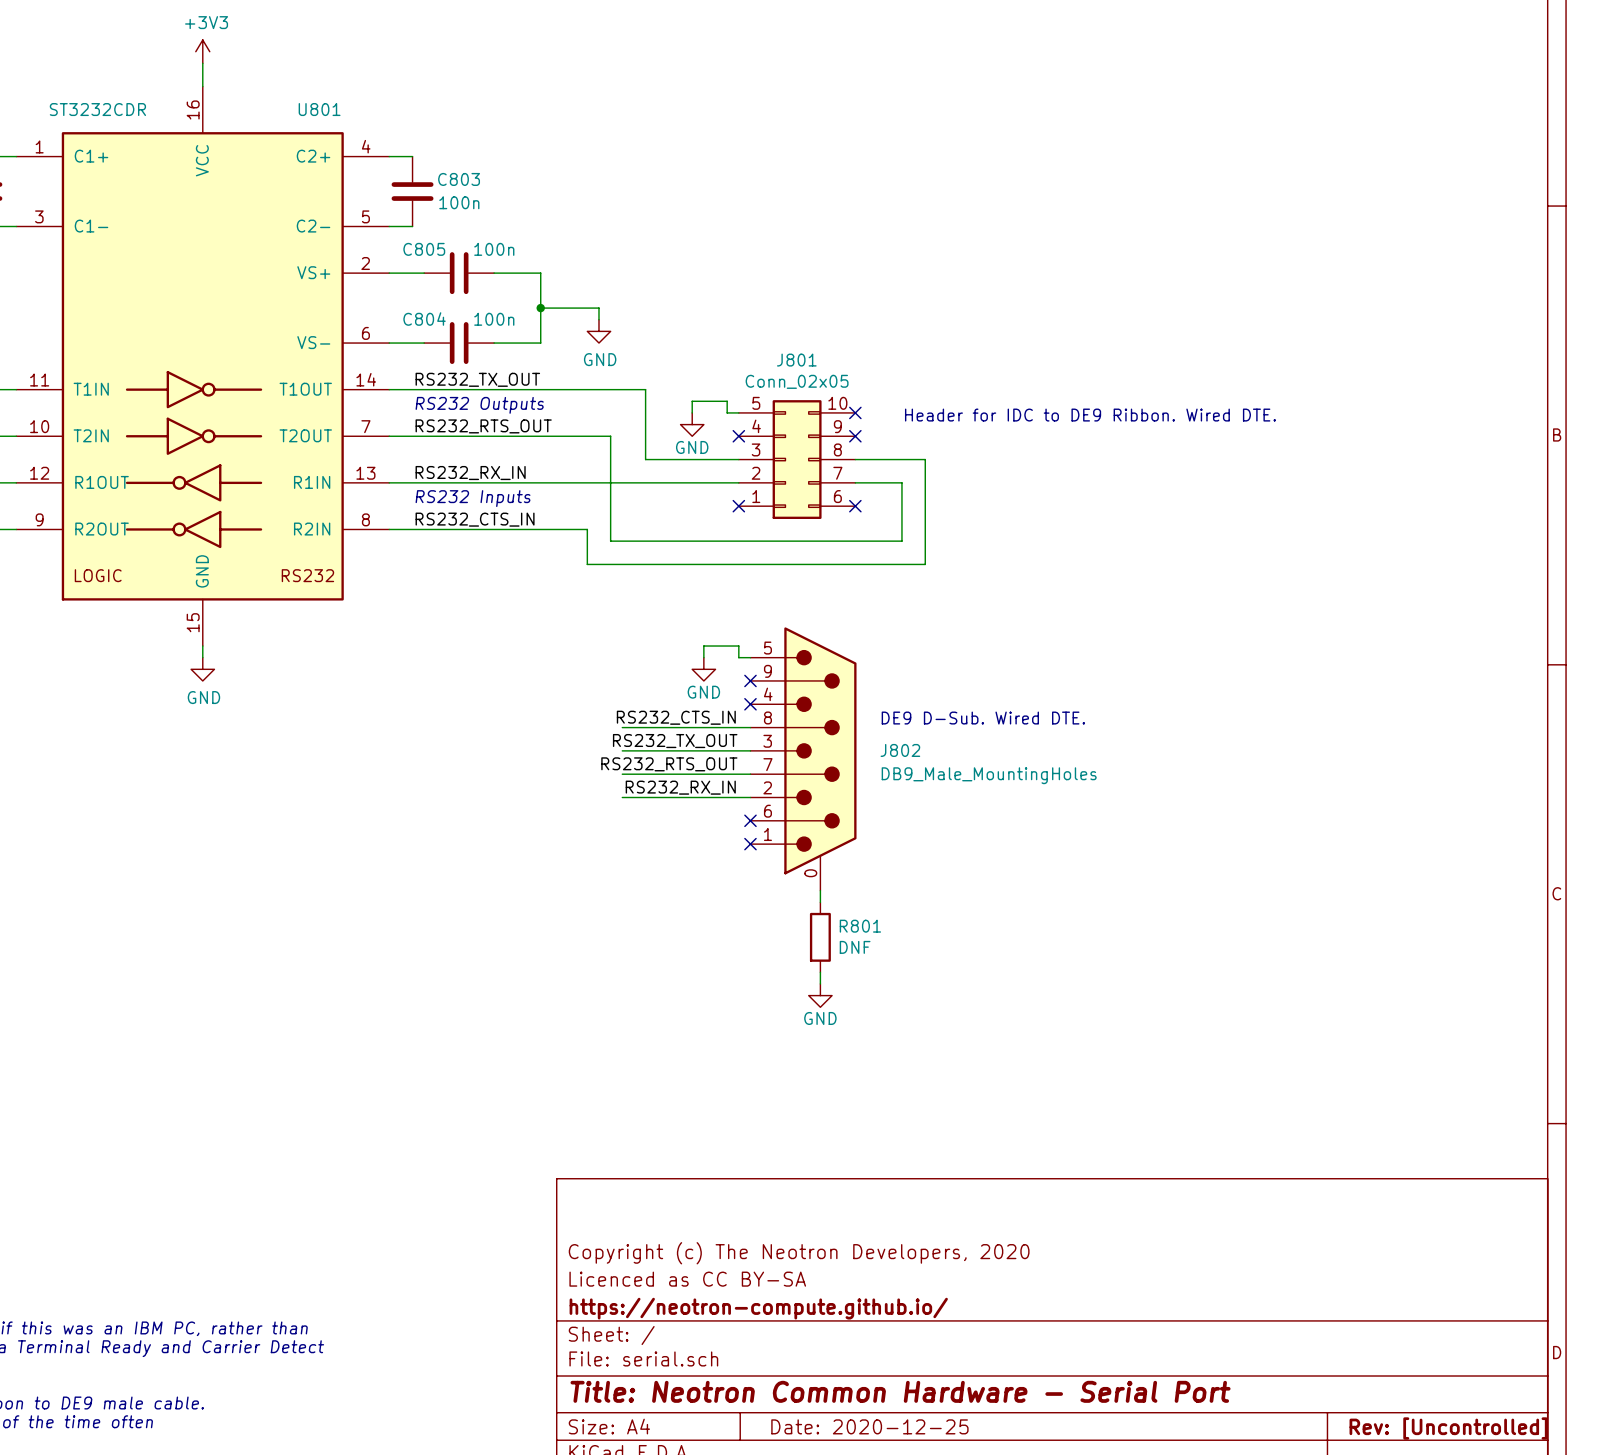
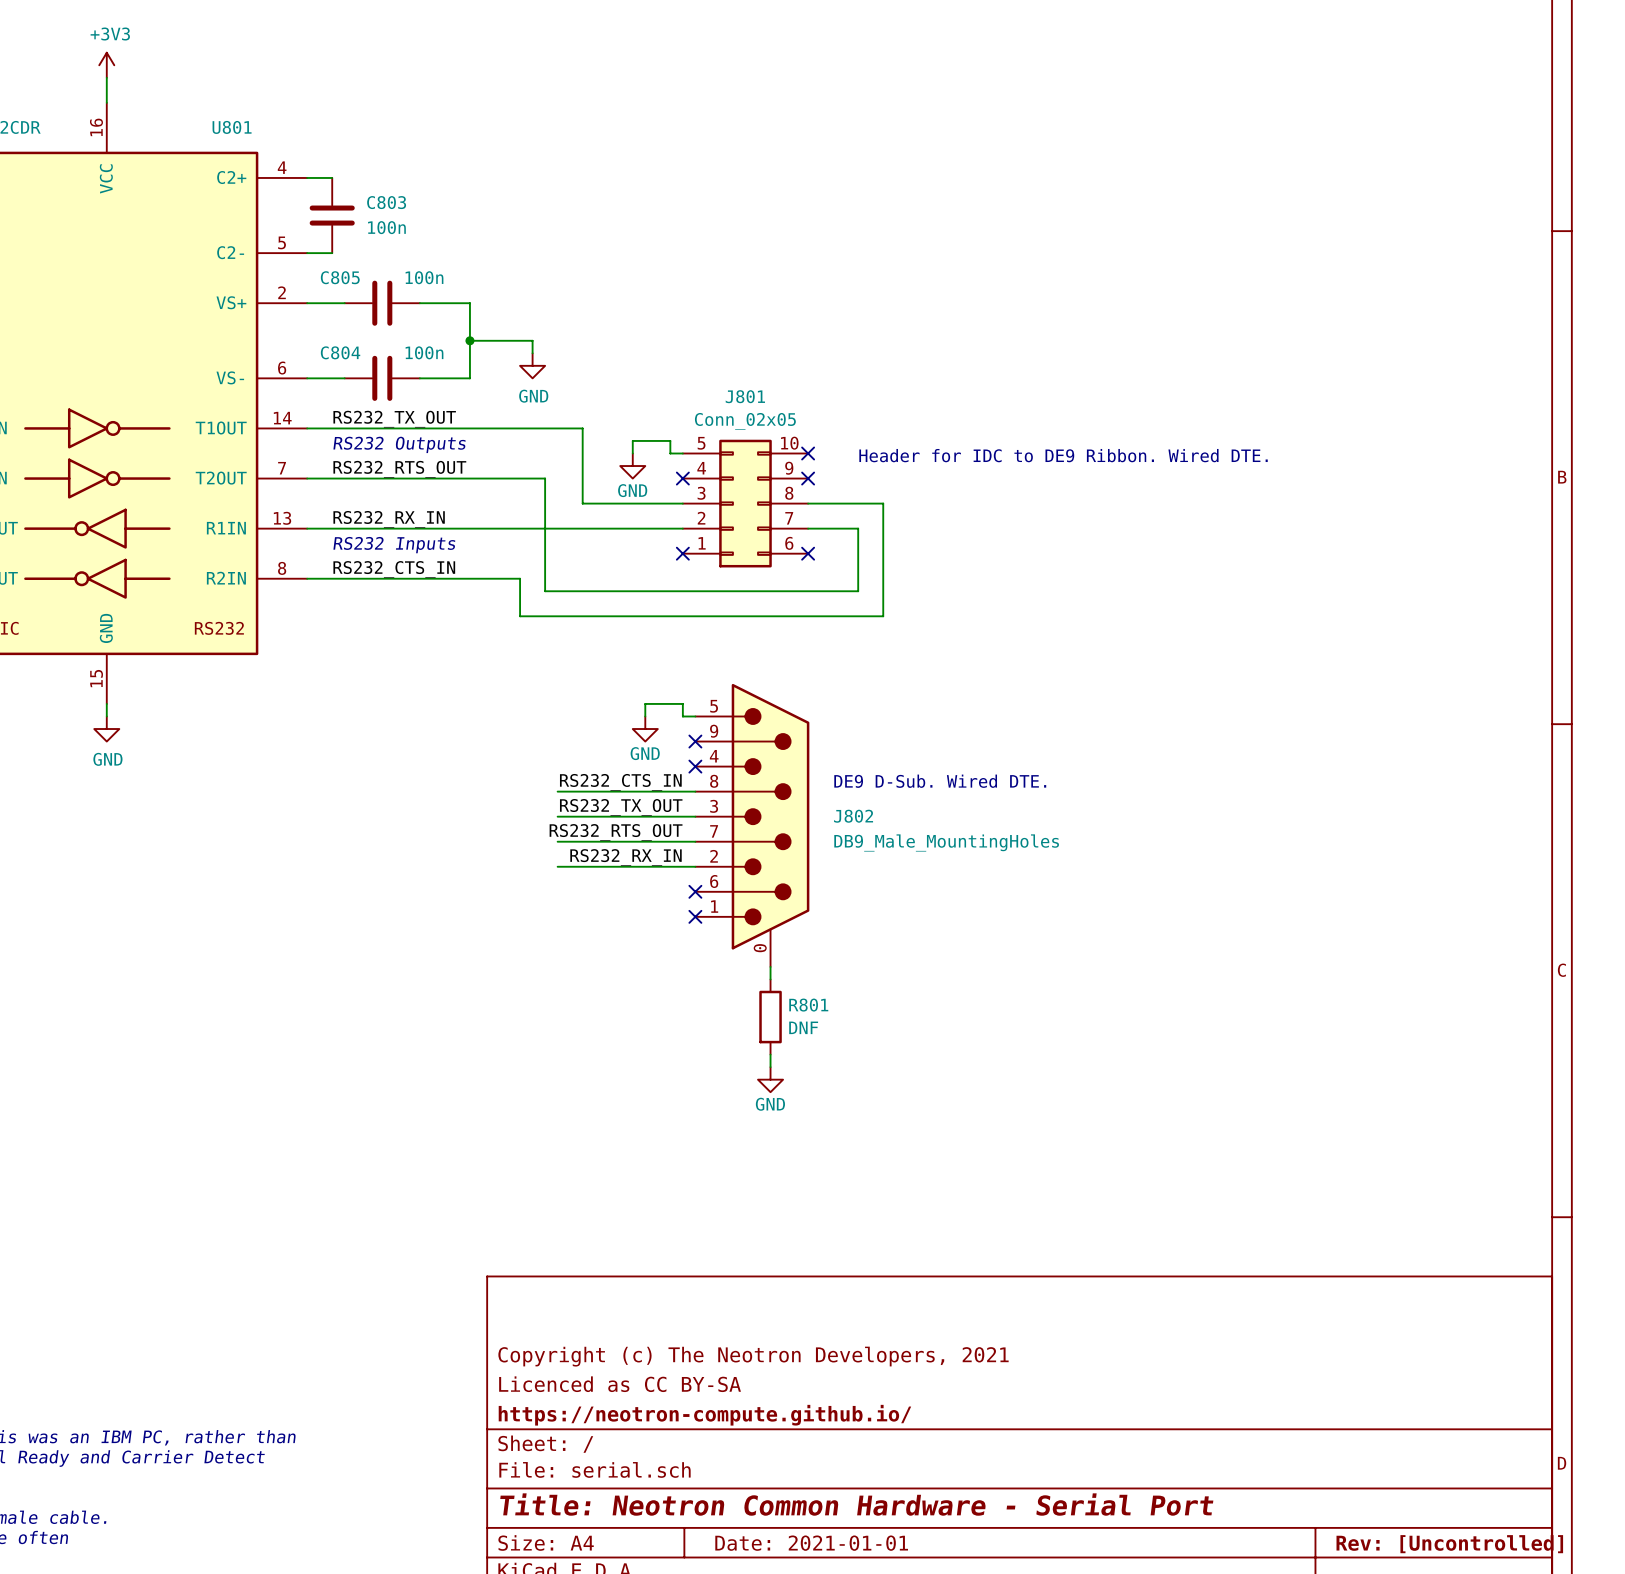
title block: Copyright (c) The Neotron Developers, 2020 (799, 1253) -> Copyright (c) The Neotron Developers, 2021 (753, 1356)
title block: Date: 2020-12-25 (869, 1426) -> Date: 2021-01-01 (811, 1543)

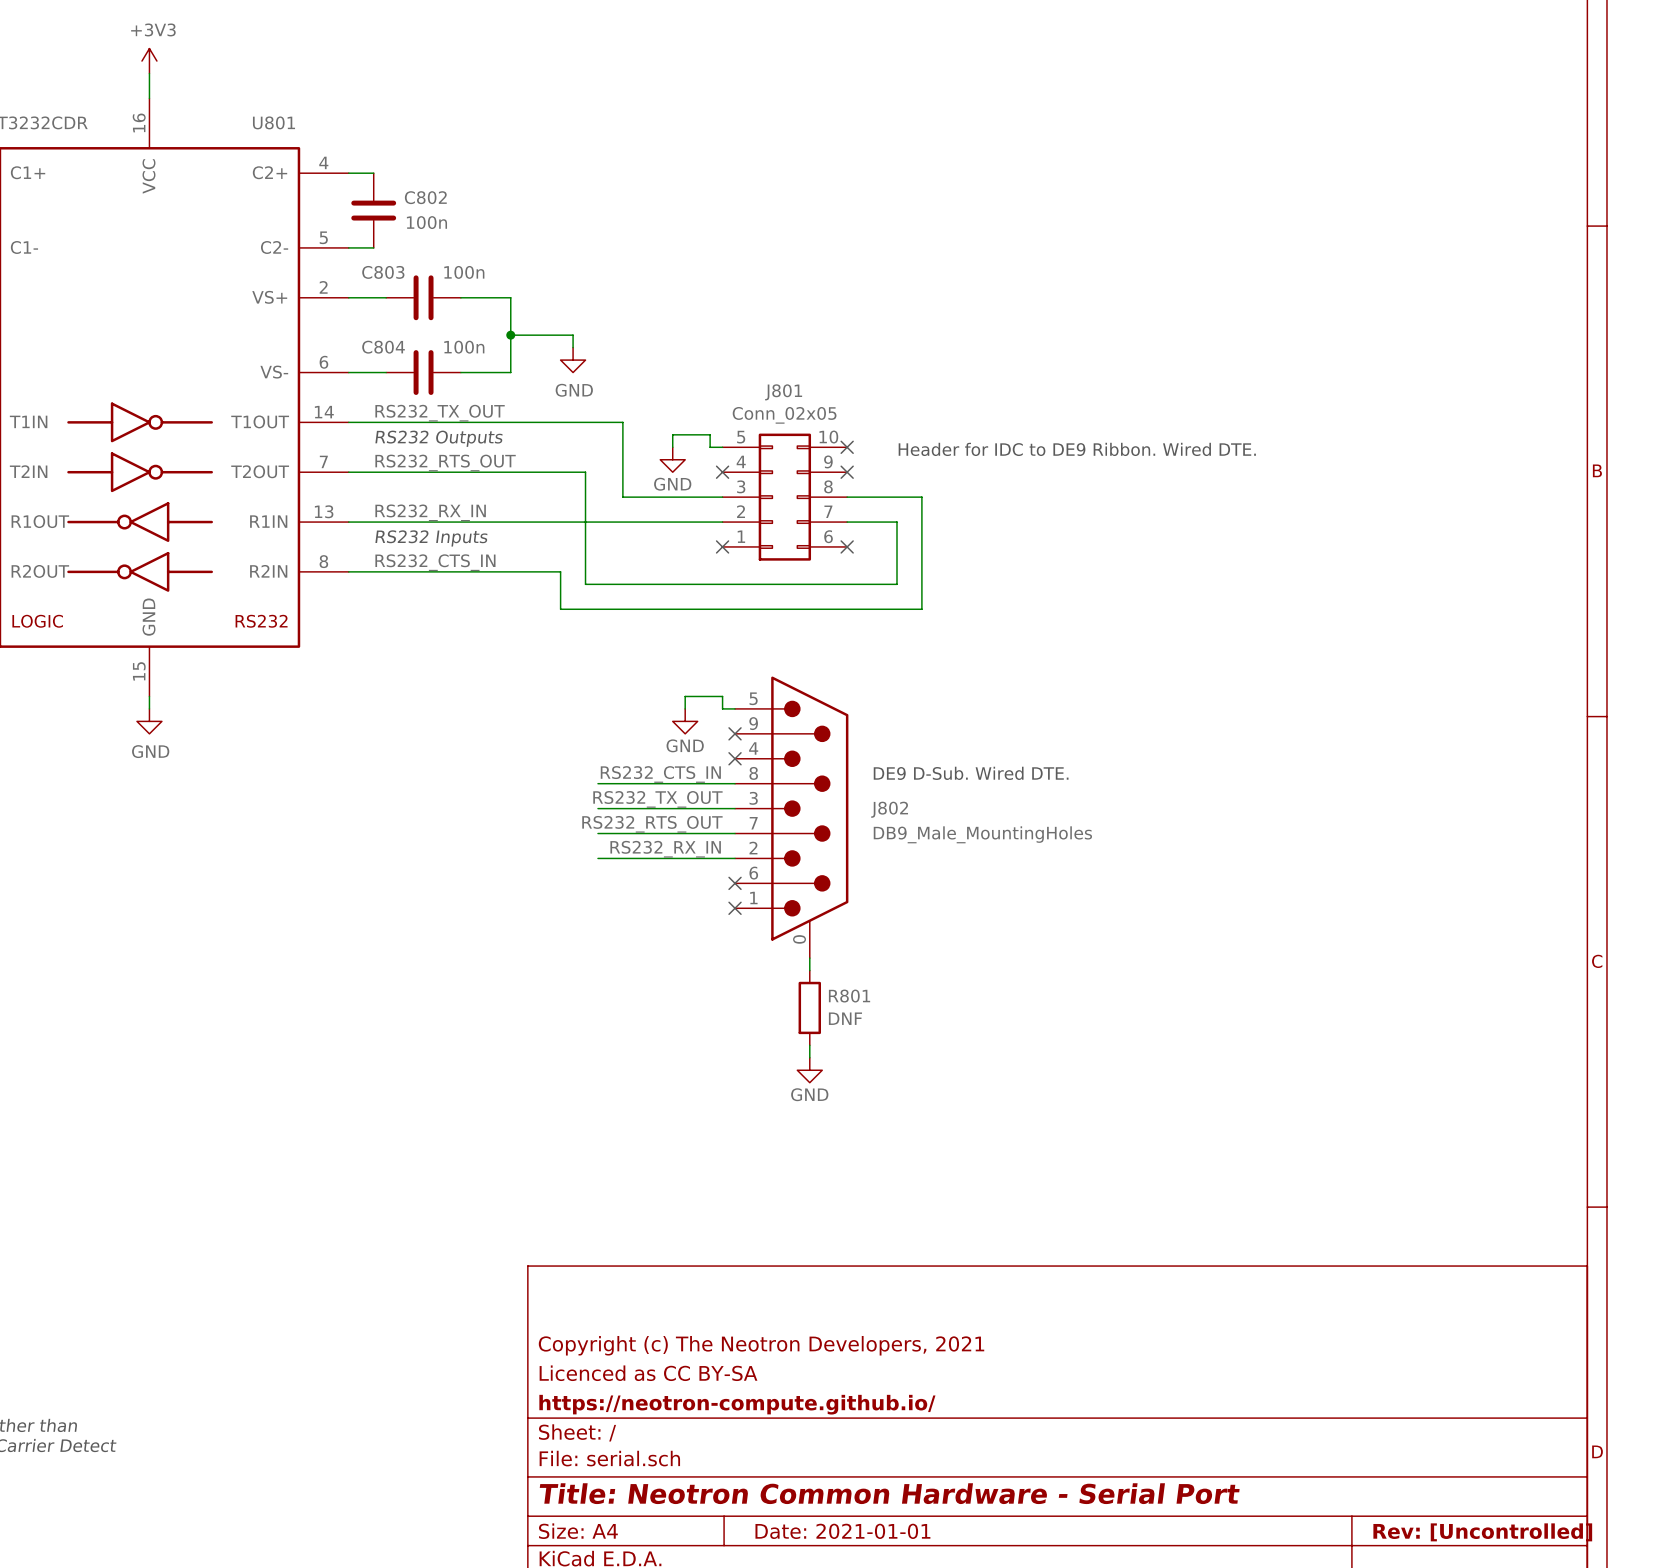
C803 name: C803 (386, 202) -> C802 (425, 197)
C805 name: C805 (340, 277) -> C803 (383, 272)

